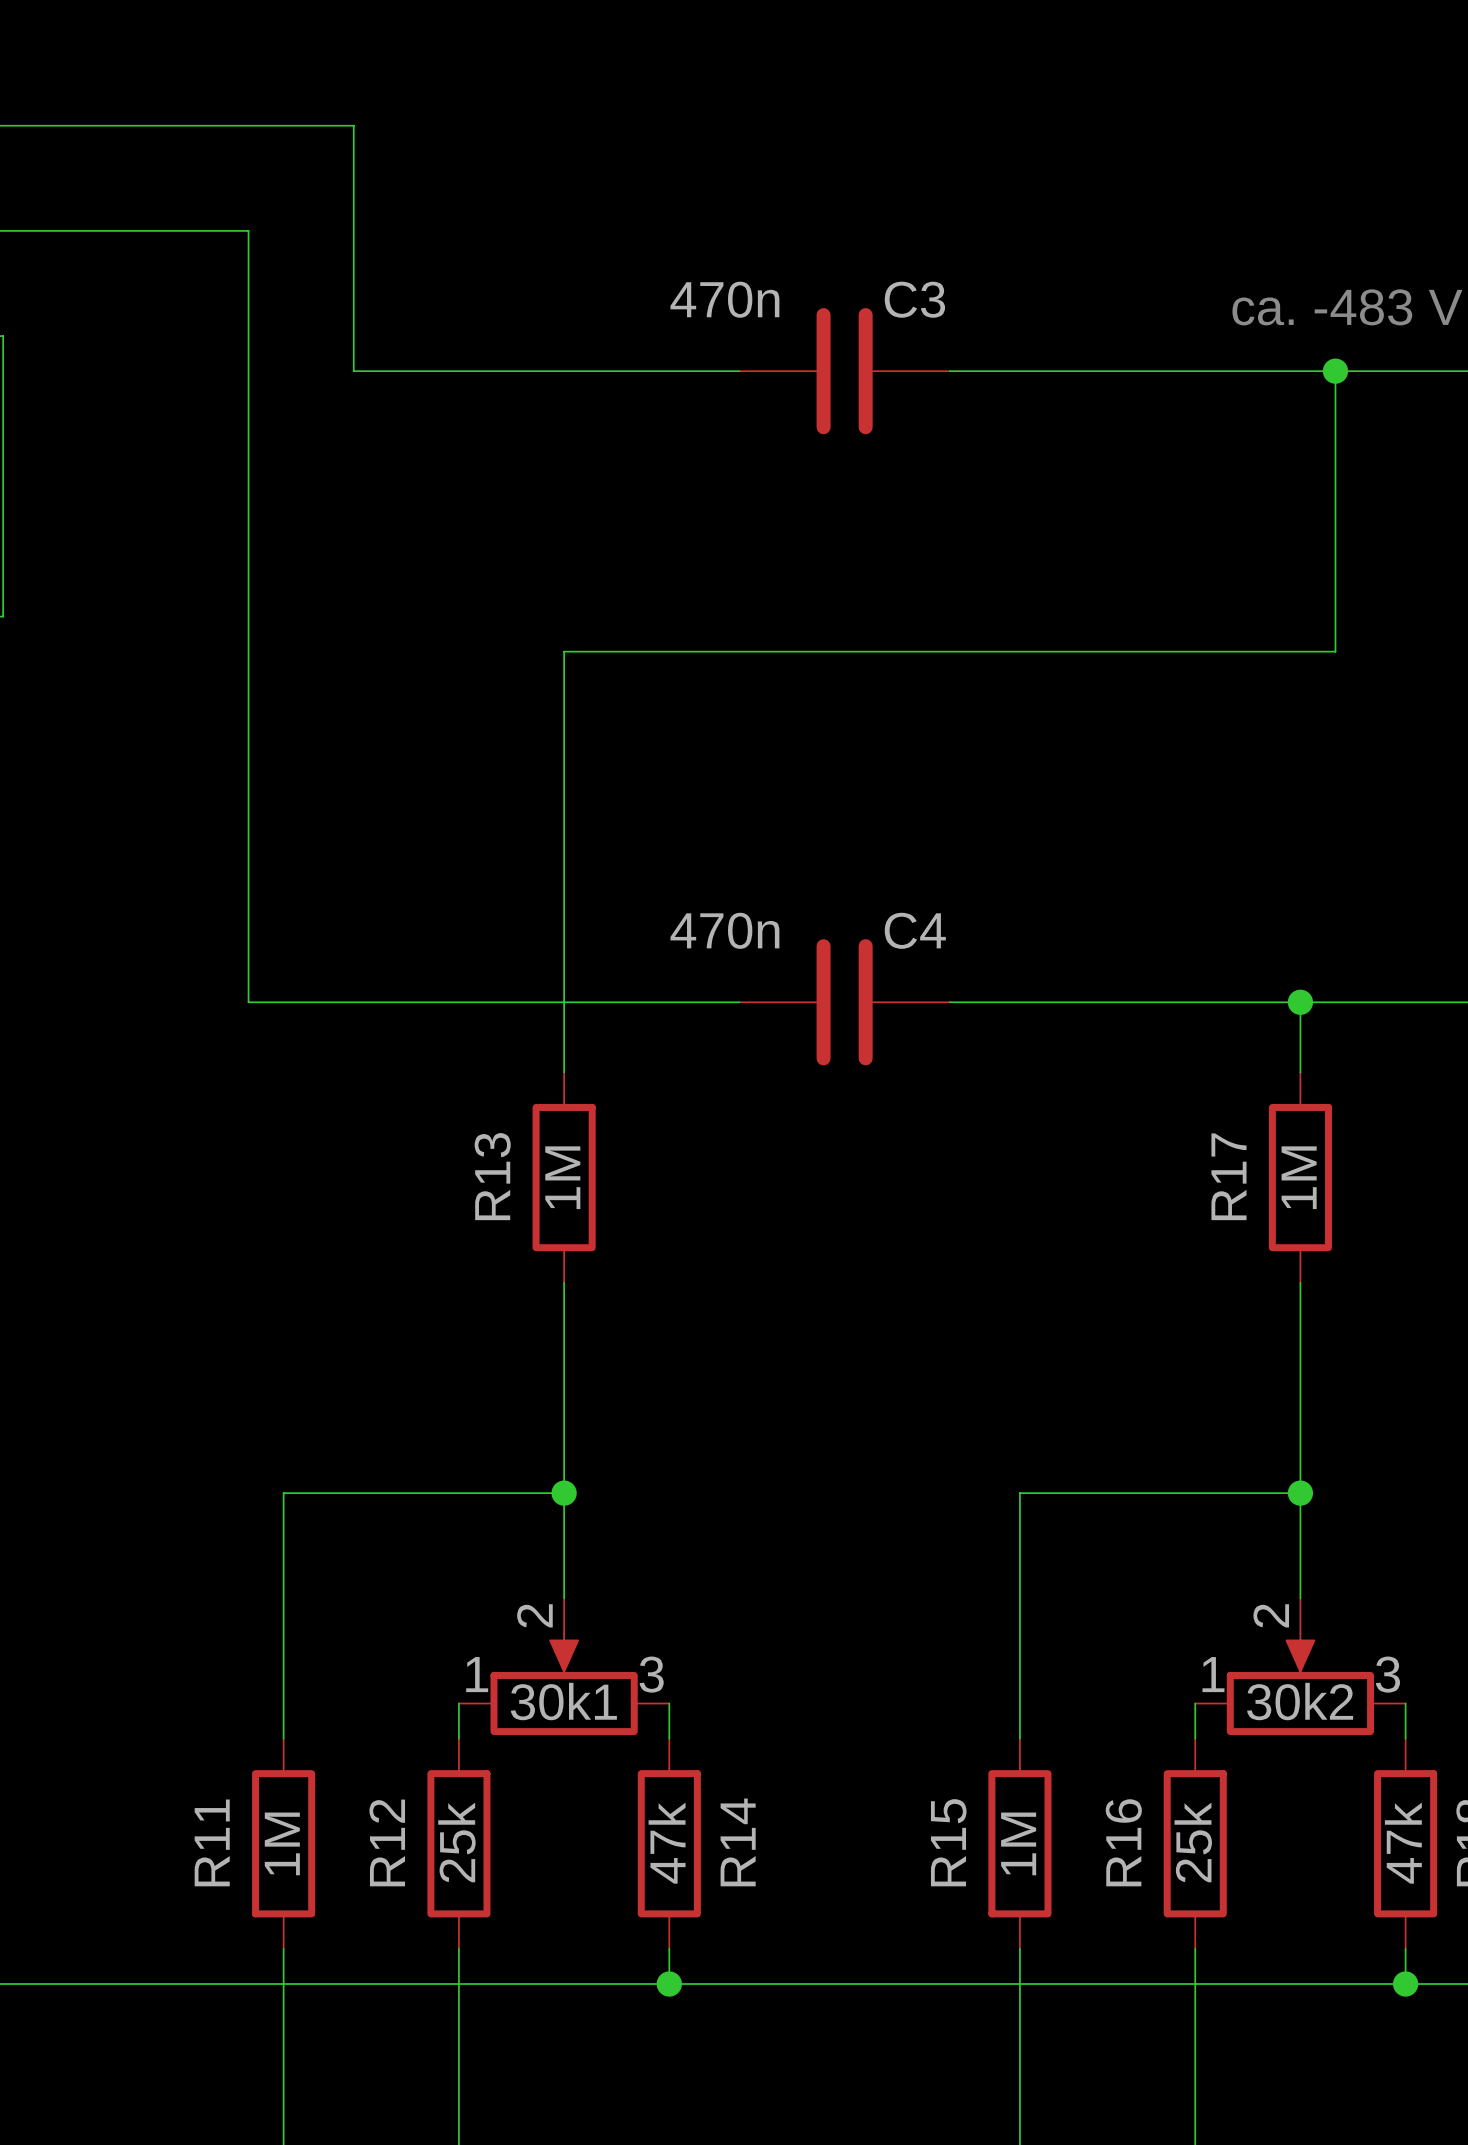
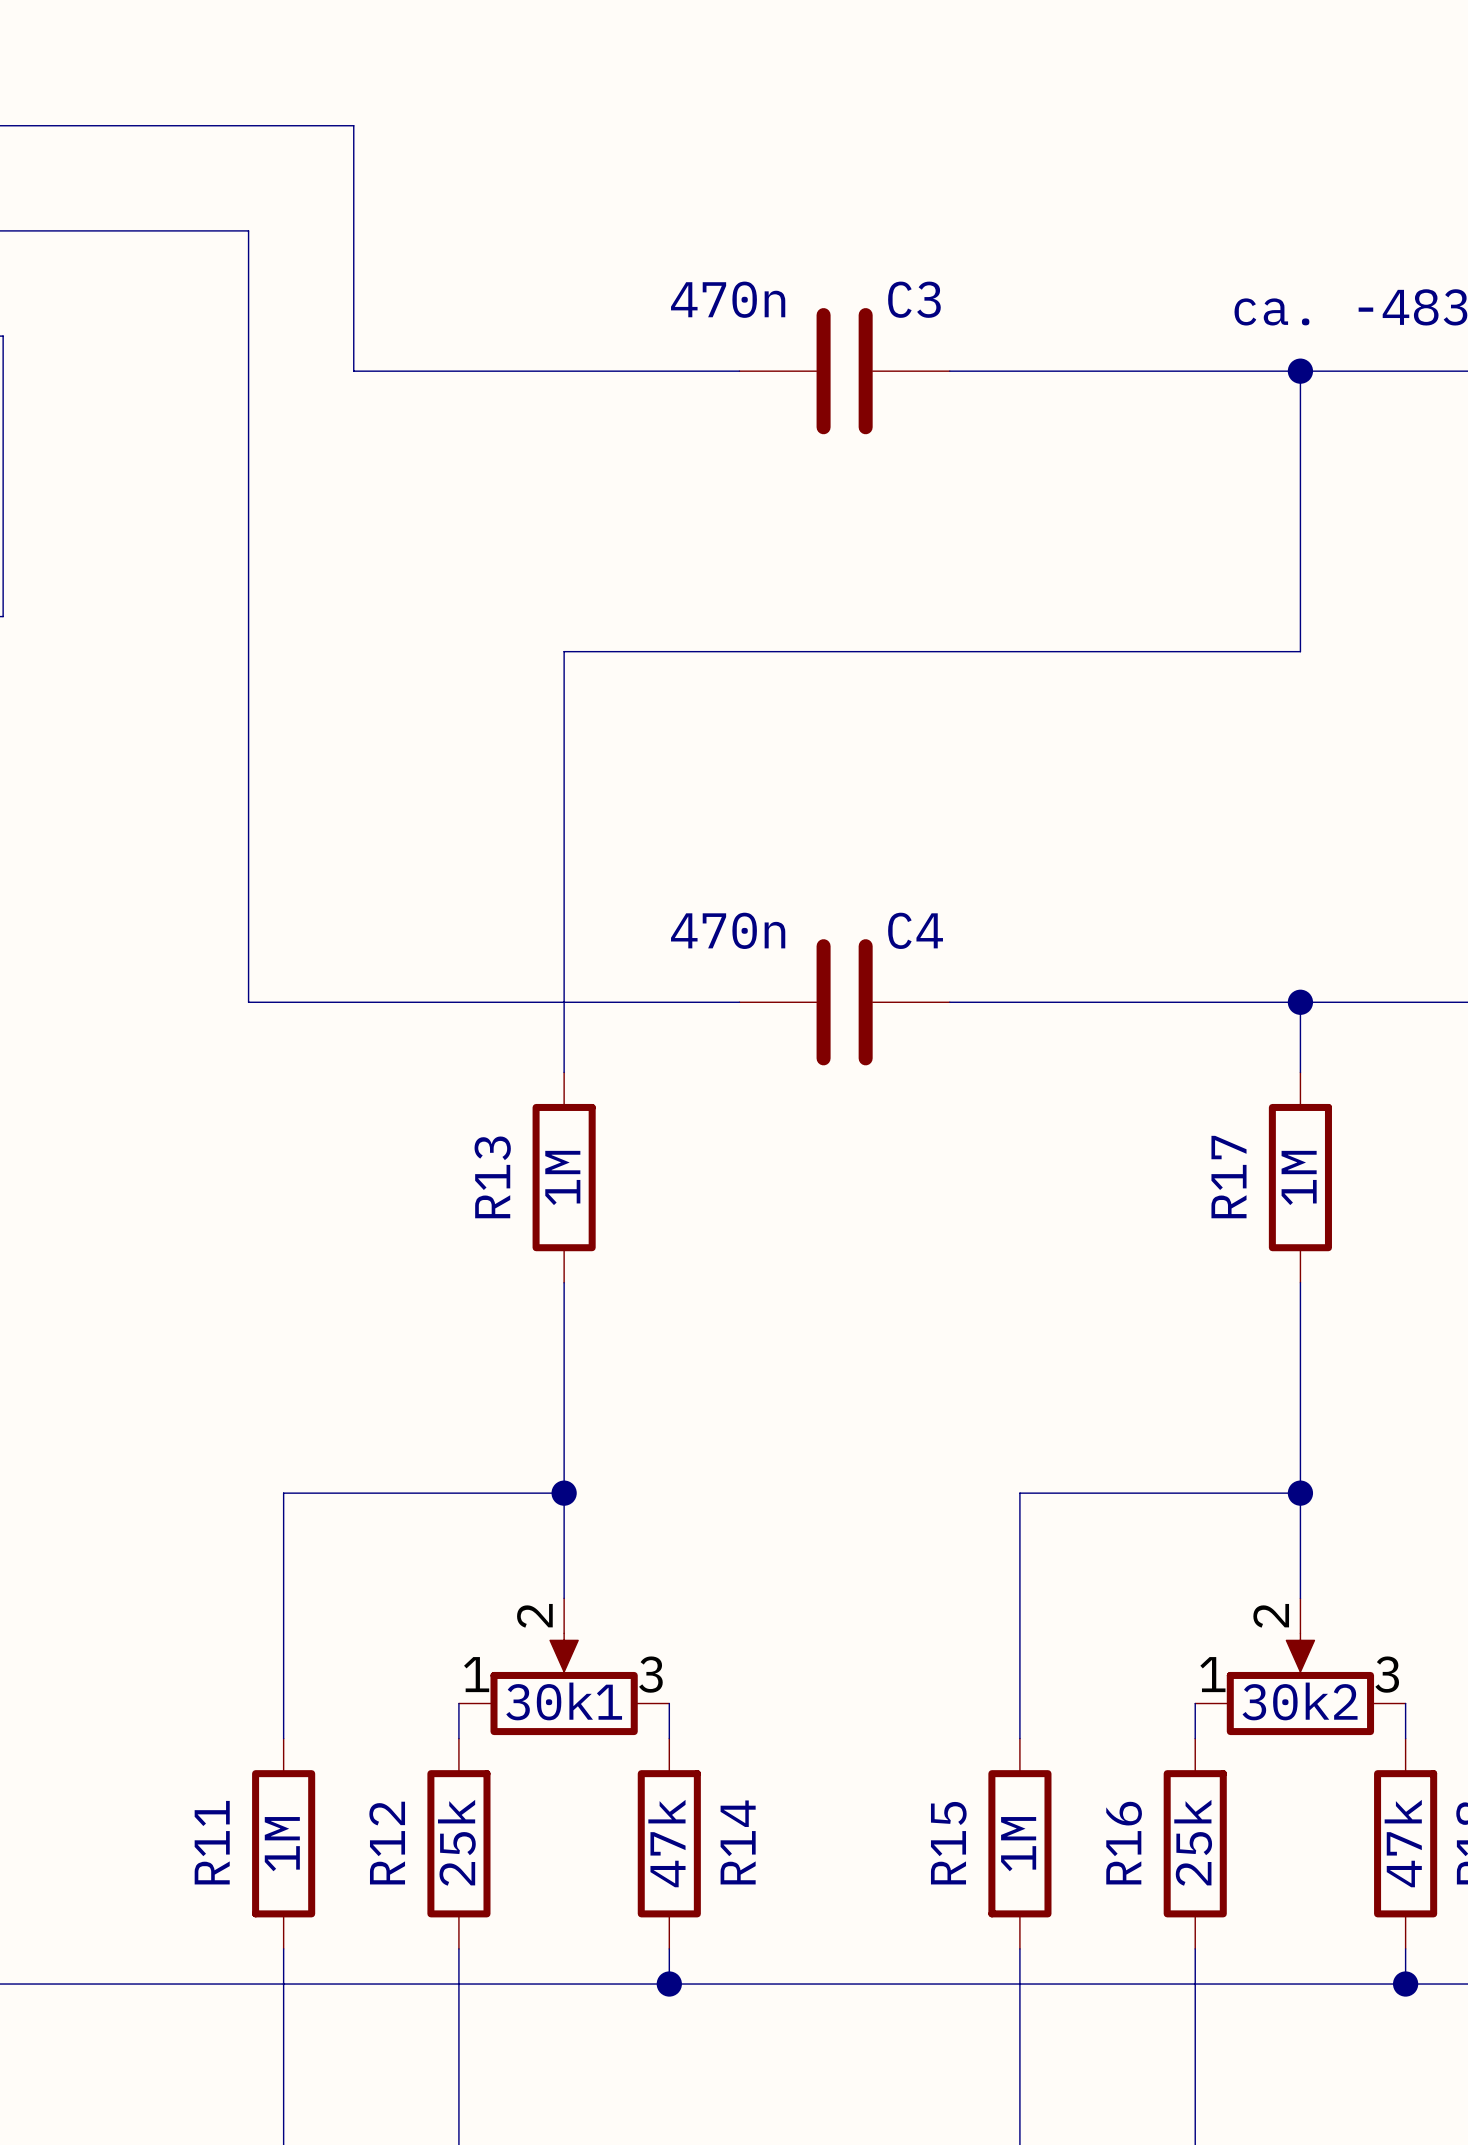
wire: (1335, 371) (1335, 651) (1300, 651) -> (1300, 371) (1300, 651)
junction position: (1335, 371) -> (1300, 371)

